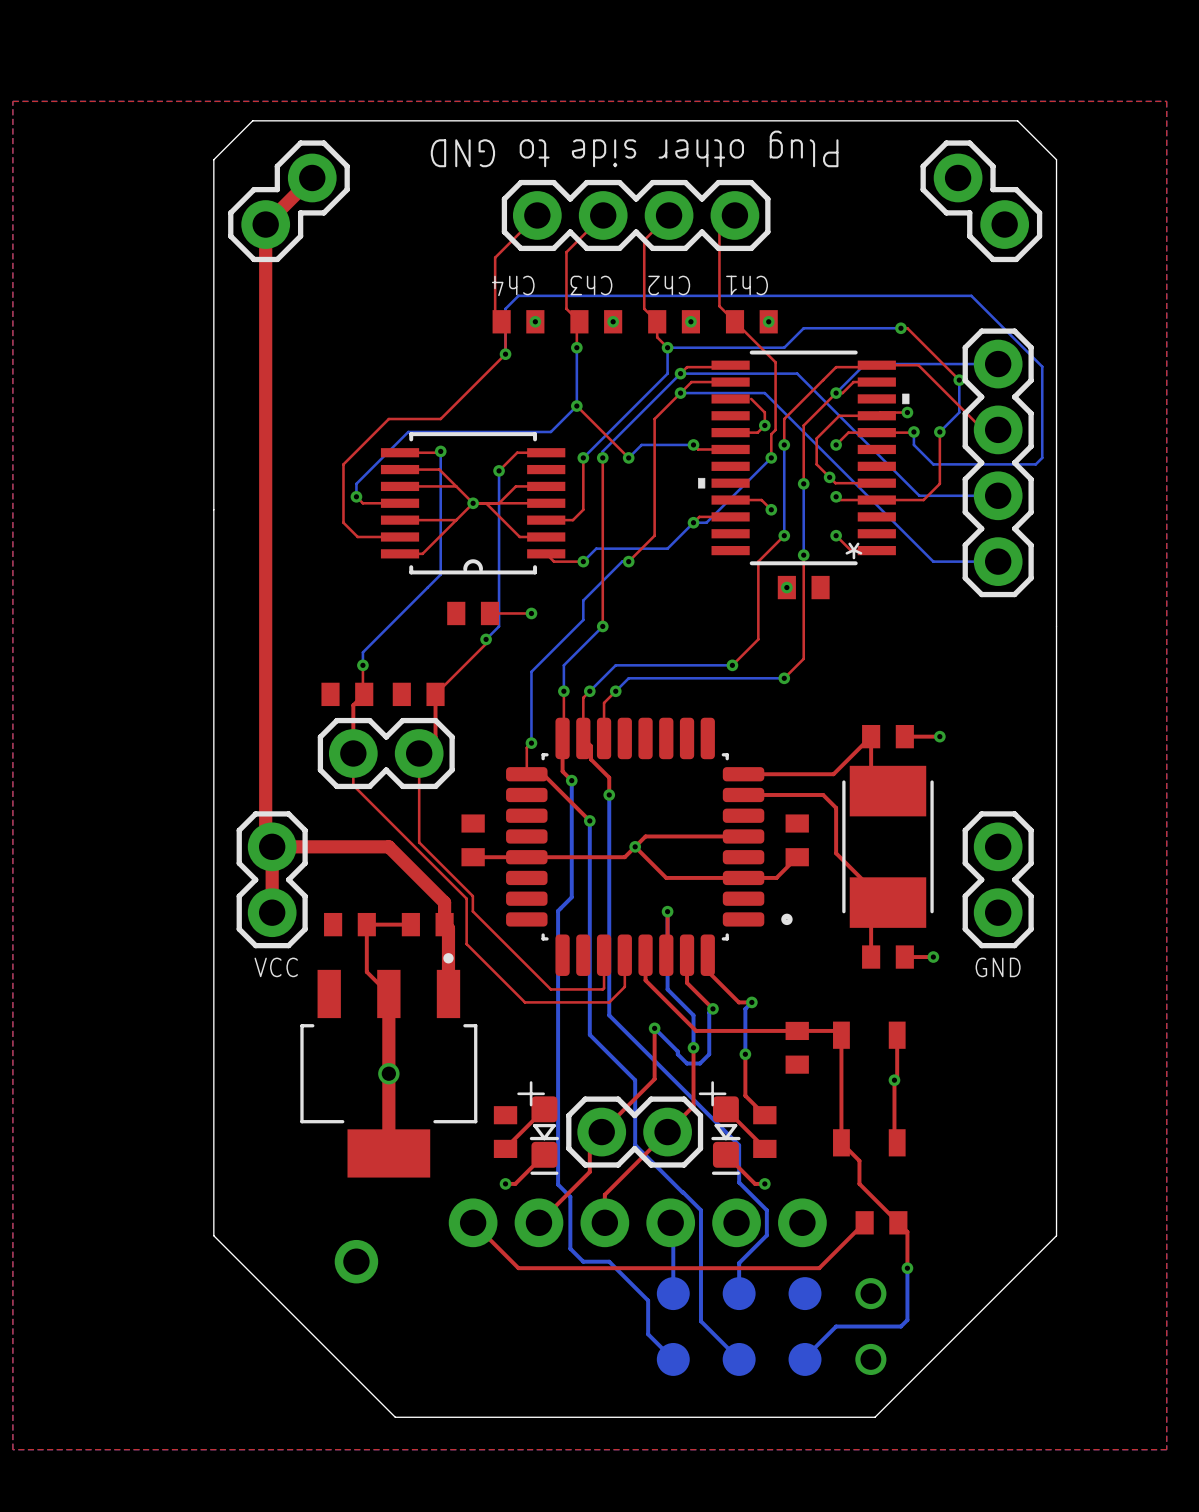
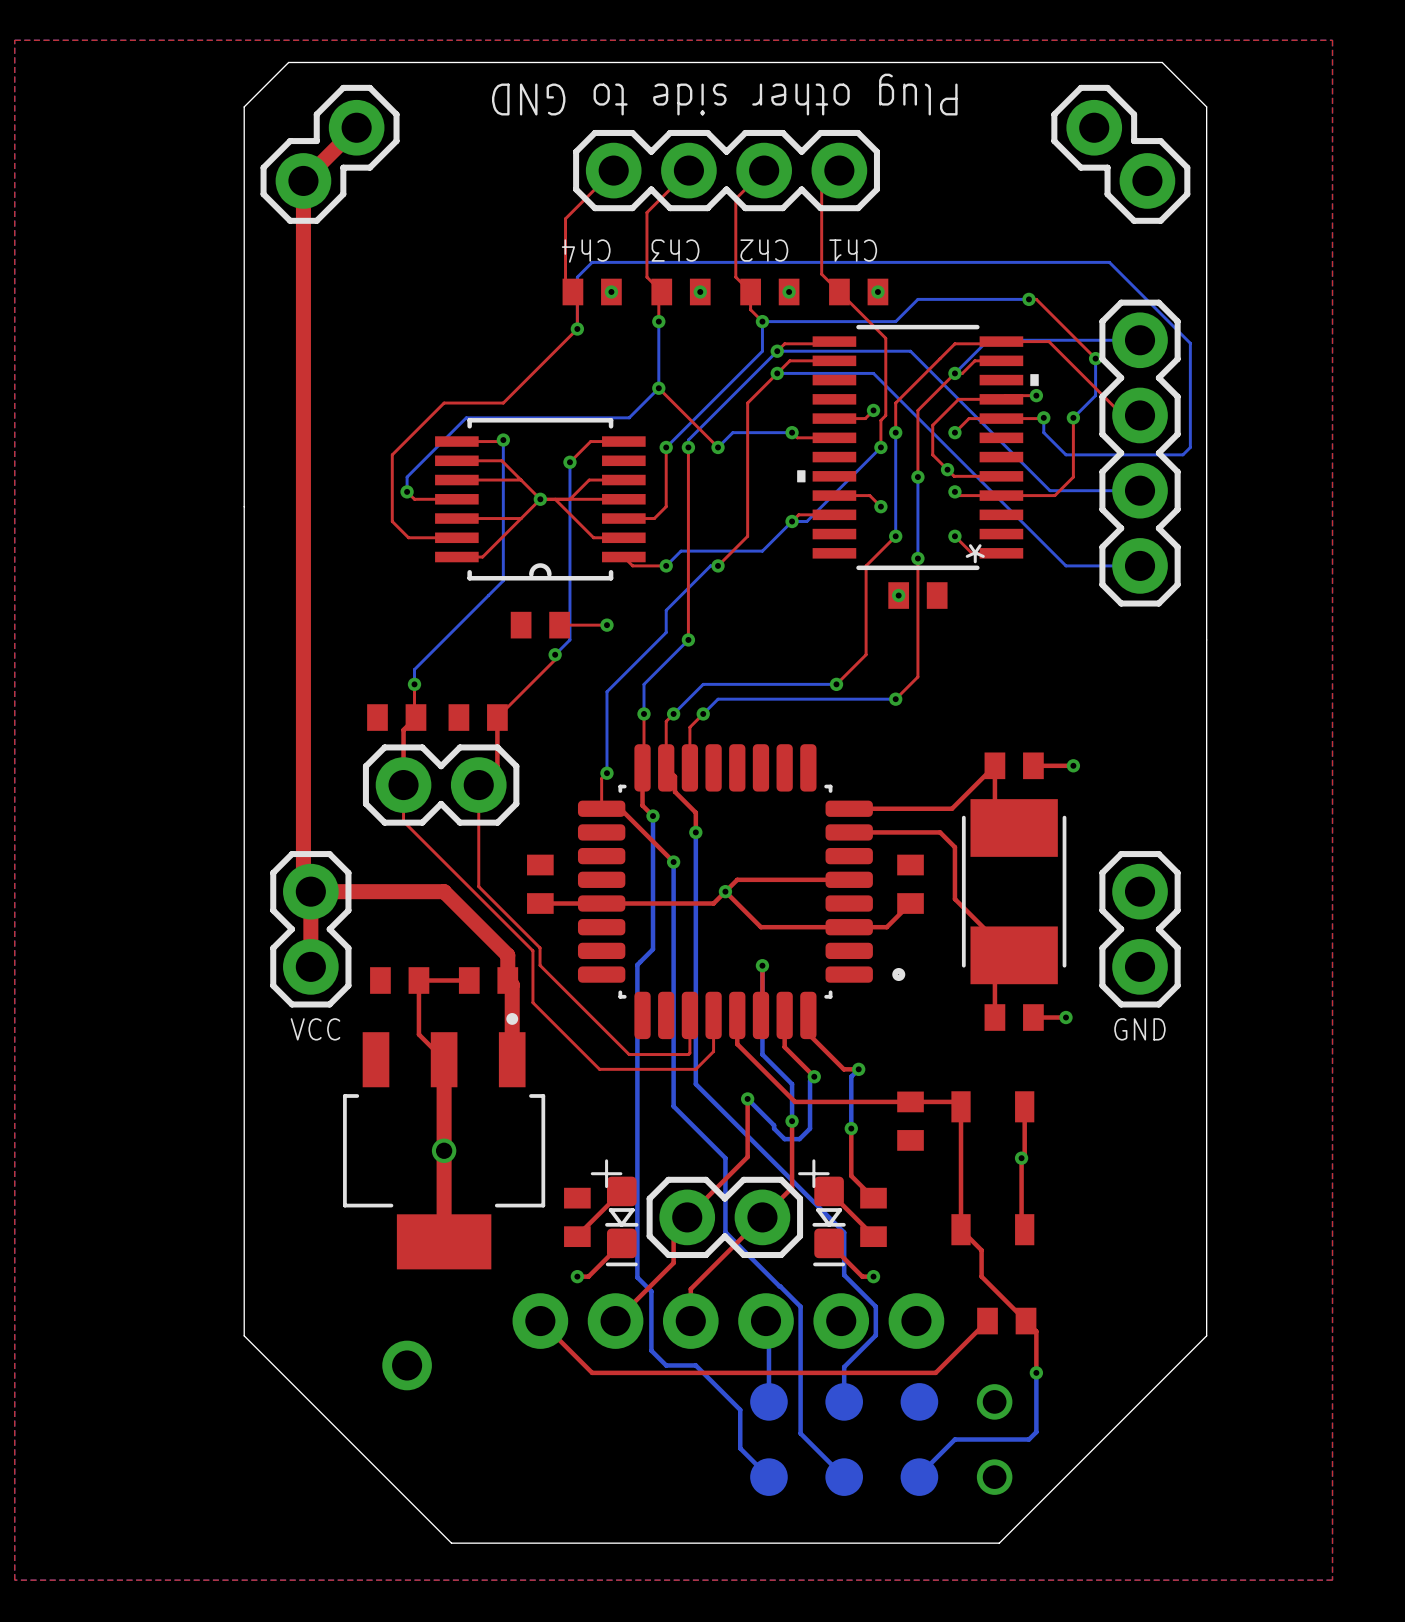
top track: (751, 398) (764, 412) (764, 425) -> none

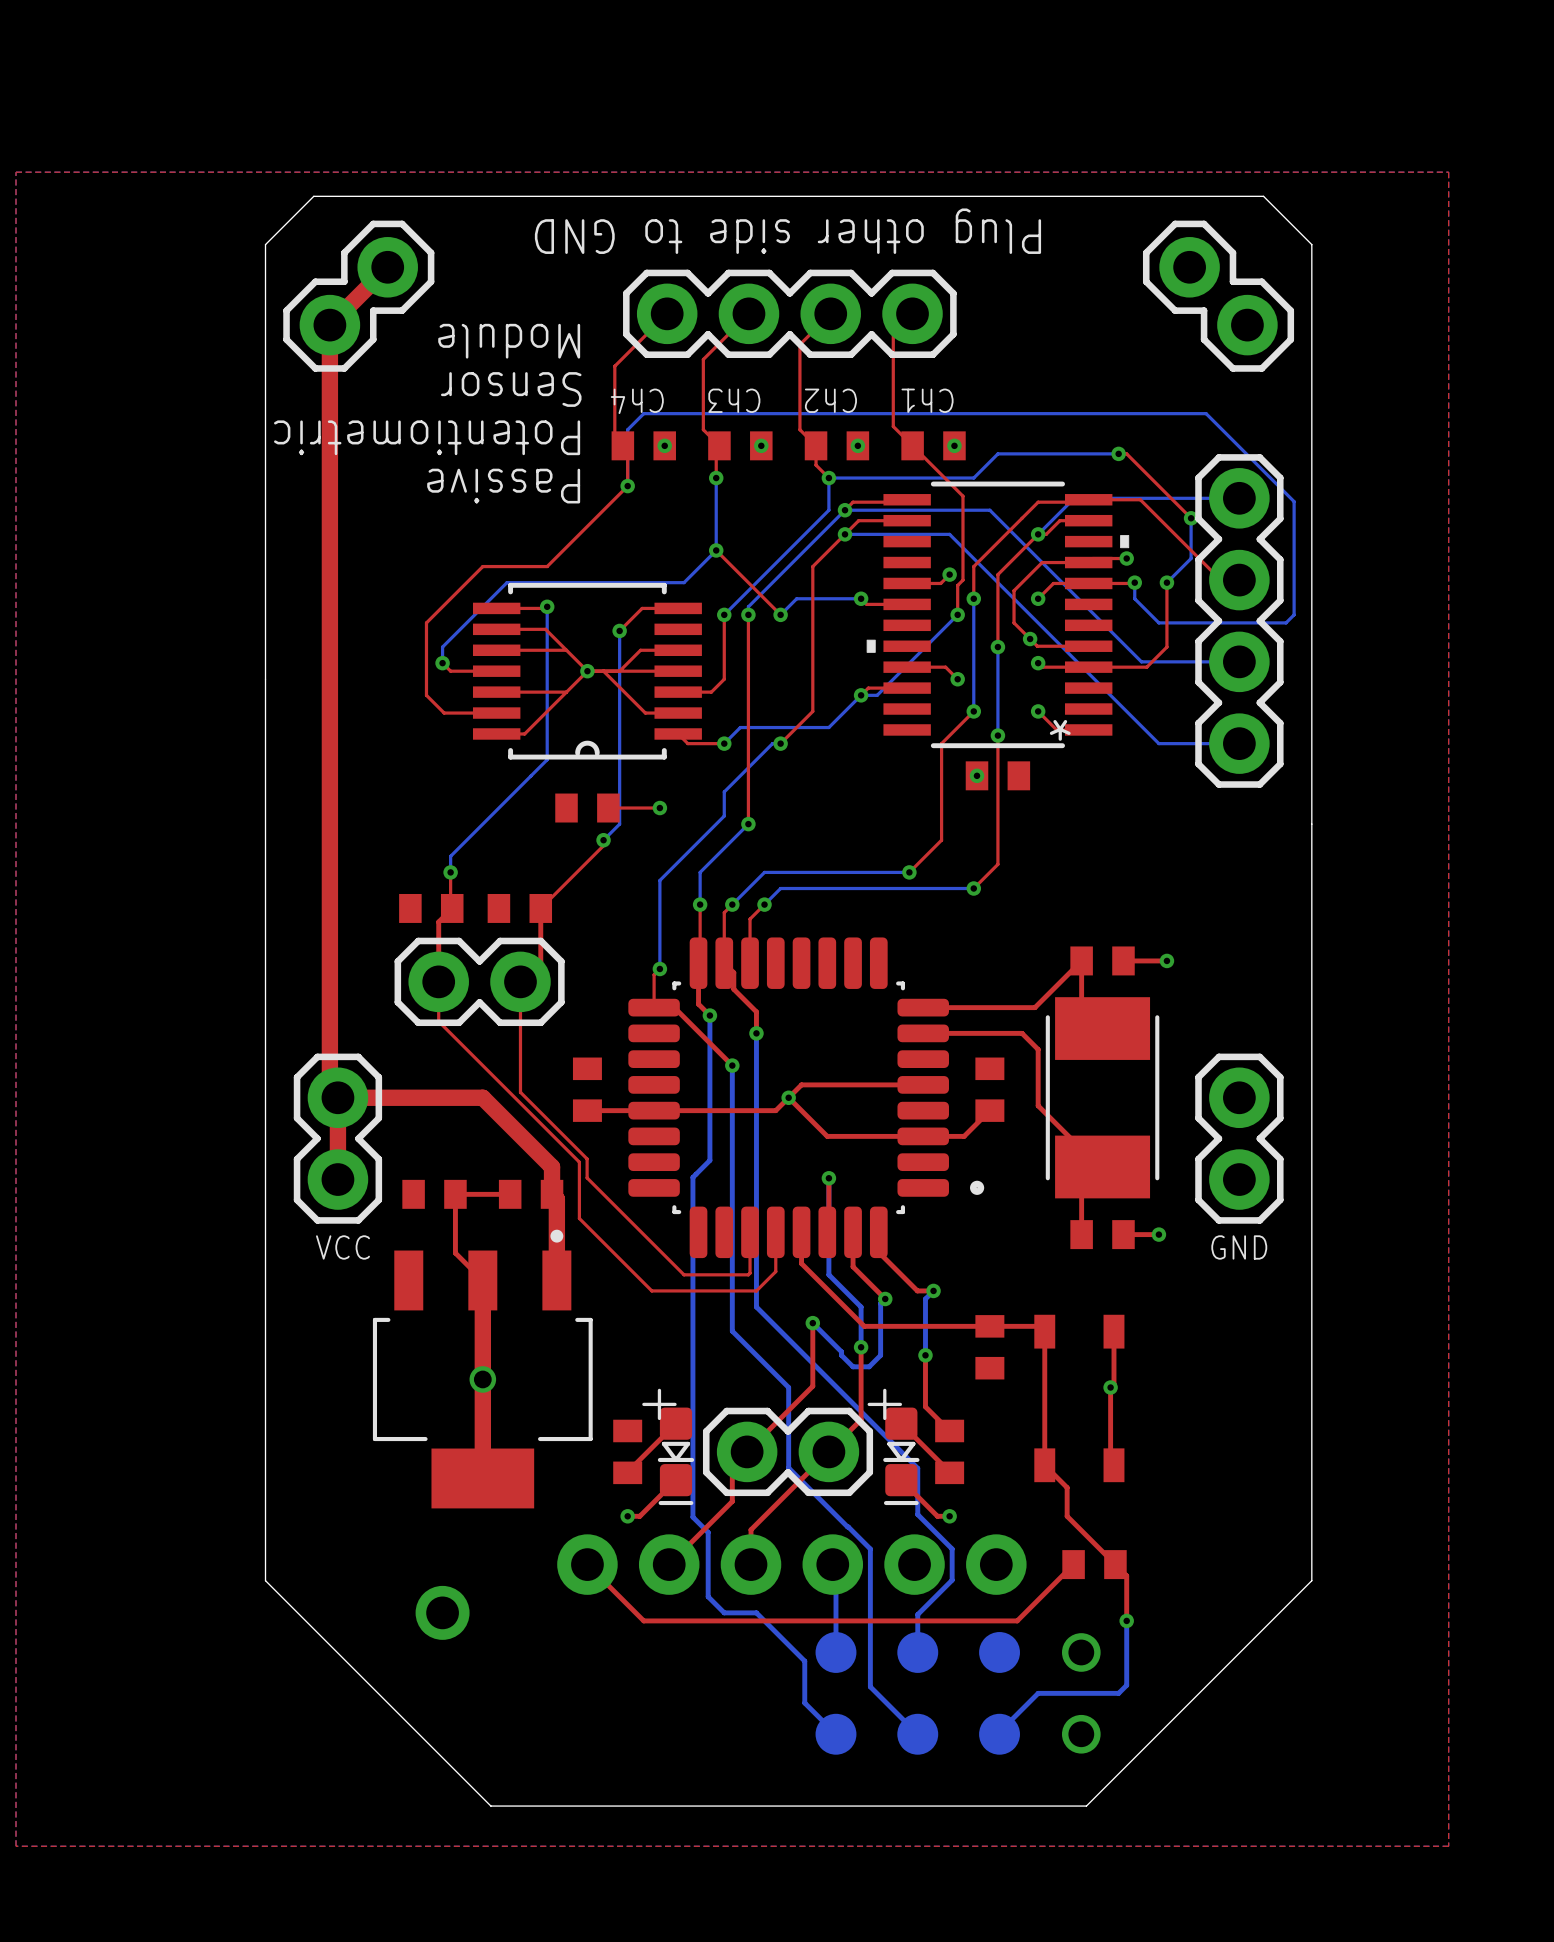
text: none -> Module (509, 341)
text: none -> Sensor (511, 389)
text: none -> Potentiometric (427, 437)
text: none -> Passive (503, 486)

